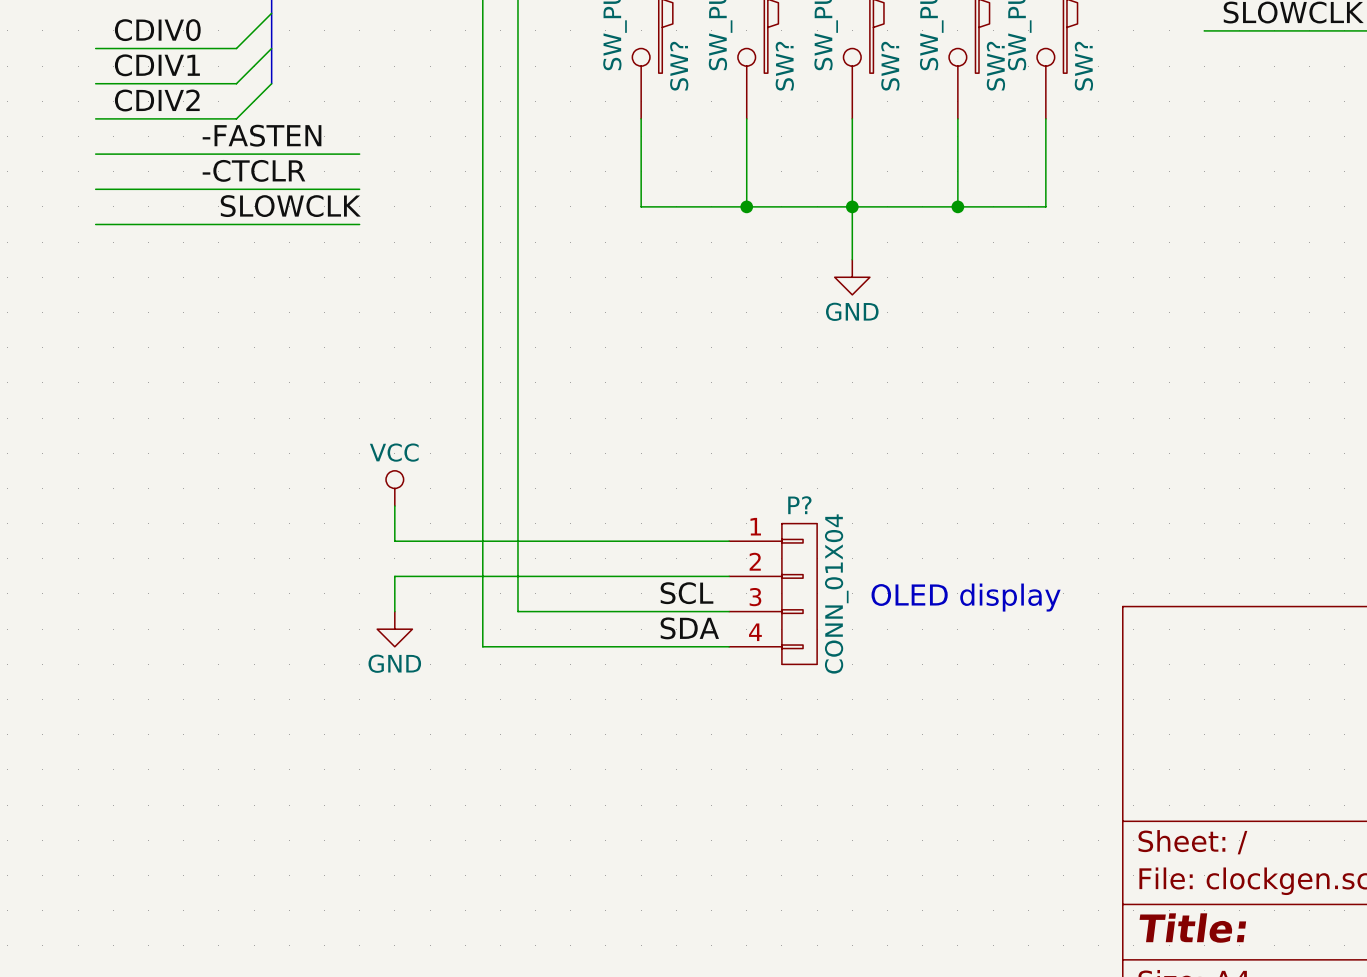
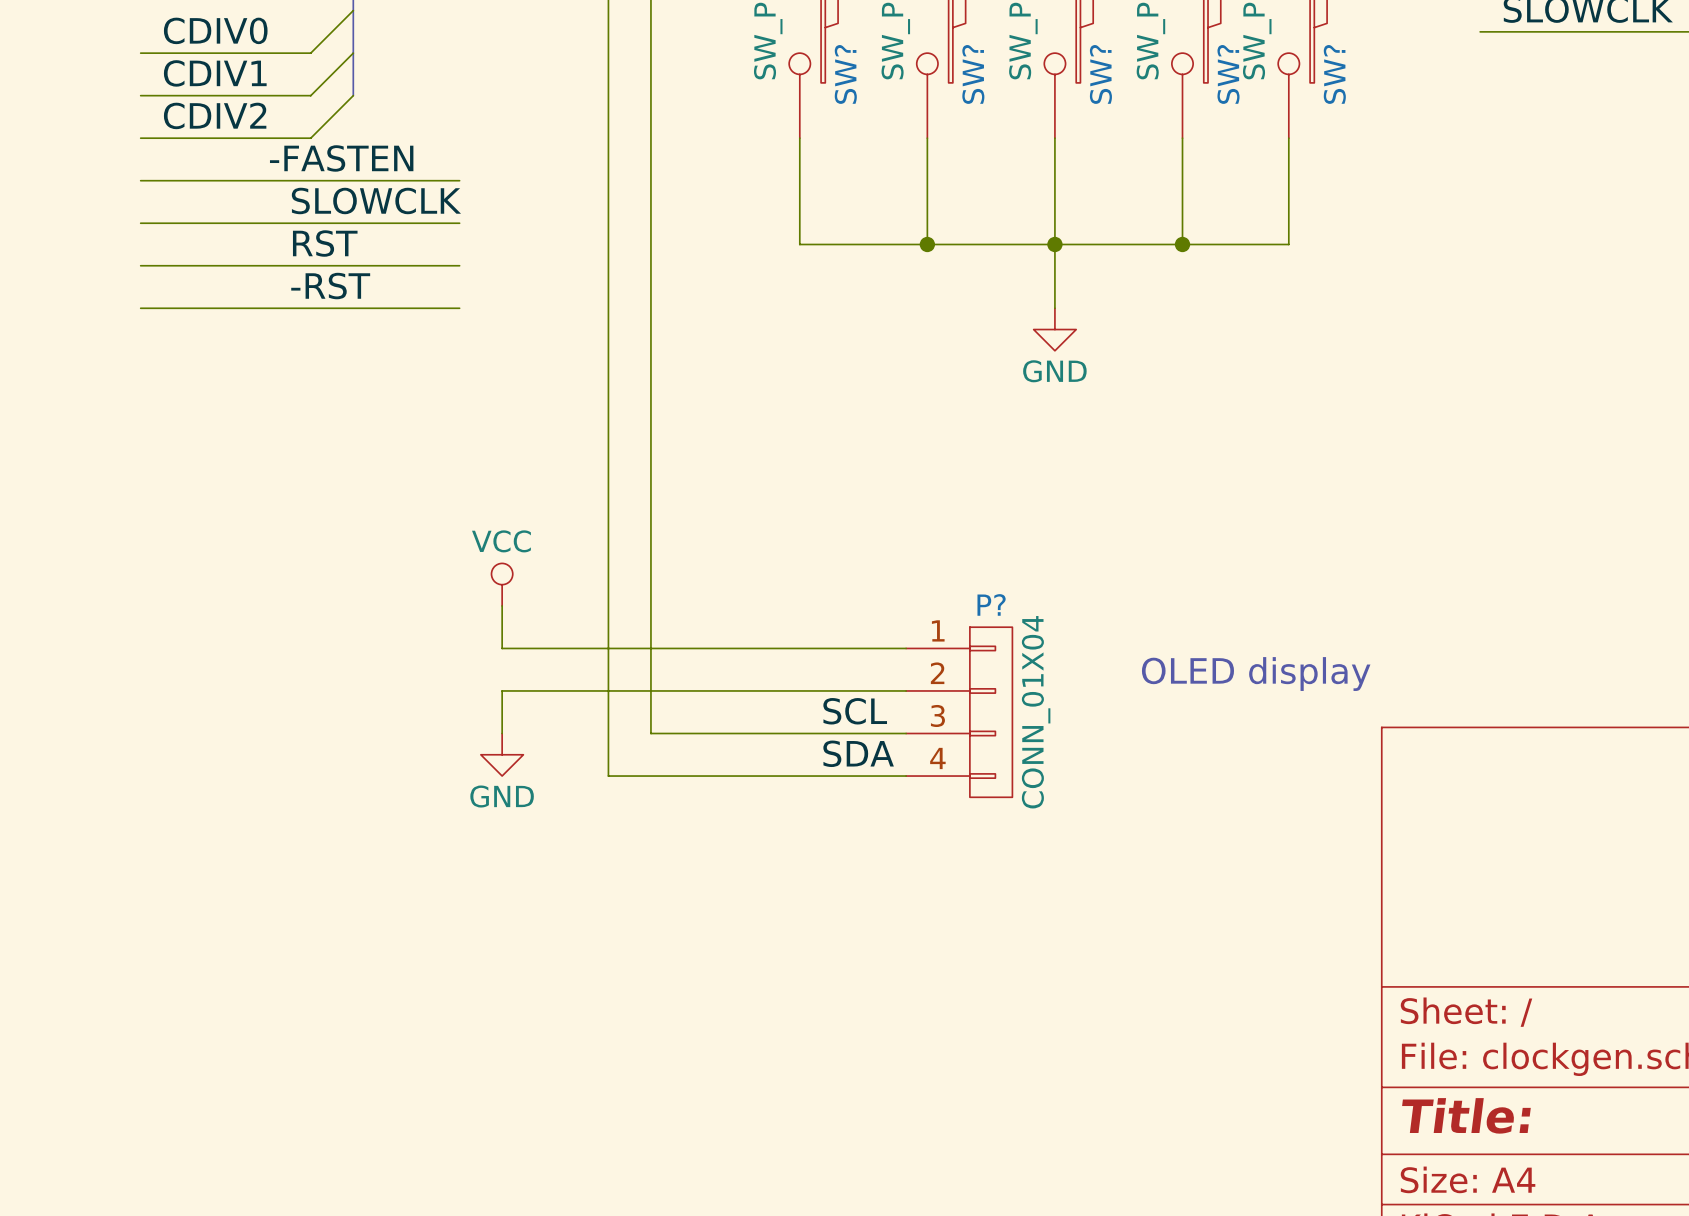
label: -CTCLR (253, 170) -> none
label: none -> SLOWCLK (376, 200)
label: SLOWCLK (290, 206) -> RST (325, 243)
label: none -> -RST (330, 286)
wire: none -> (140, 308) (459, 308)
text position: OLED display (966, 597) -> OLED display (1256, 674)

